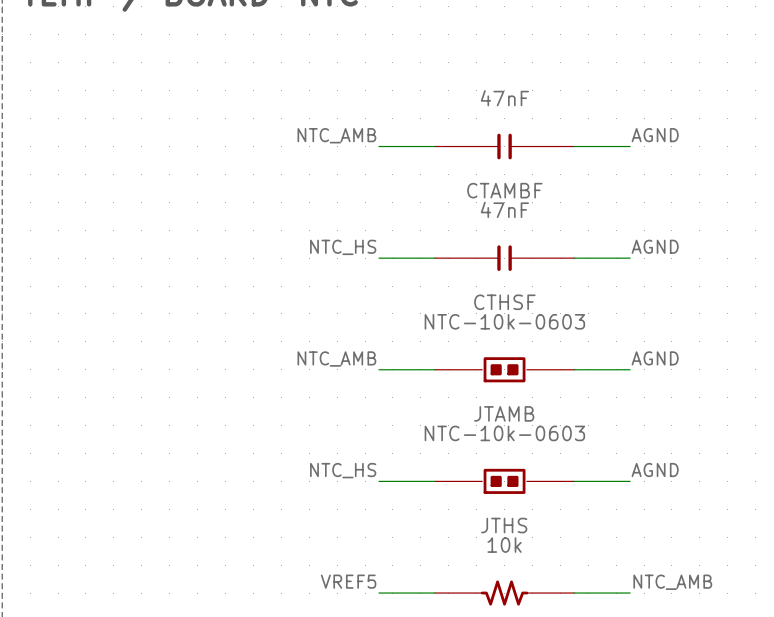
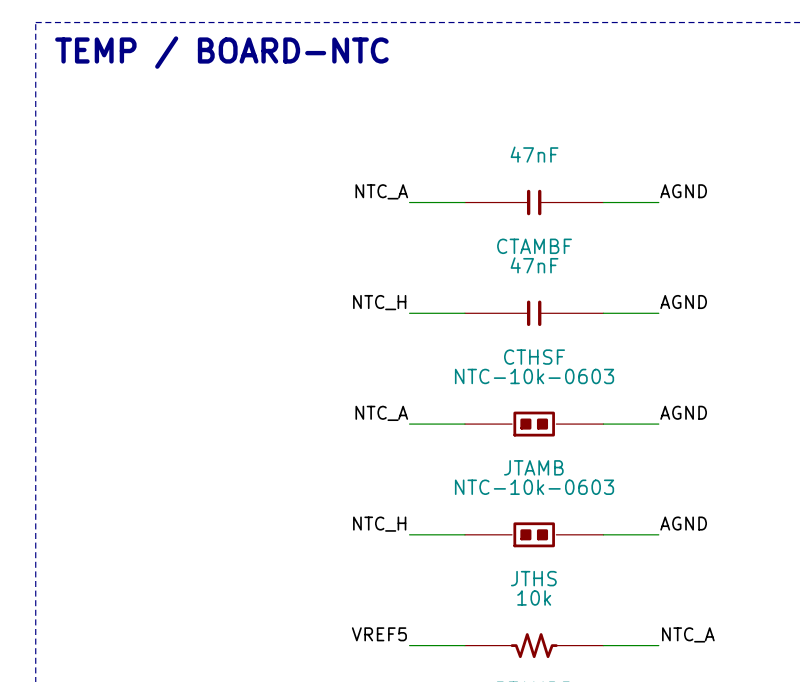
label: NTC_AMB (336, 135) -> NTC_A (381, 191)
label: NTC_HS (343, 247) -> NTC_H (379, 302)
label: NTC_AMB (336, 358) -> NTC_A (381, 413)
label: NTC_HS (343, 470) -> NTC_H (379, 524)
label: NTC_AMB (672, 582) -> NTC_A (688, 634)

